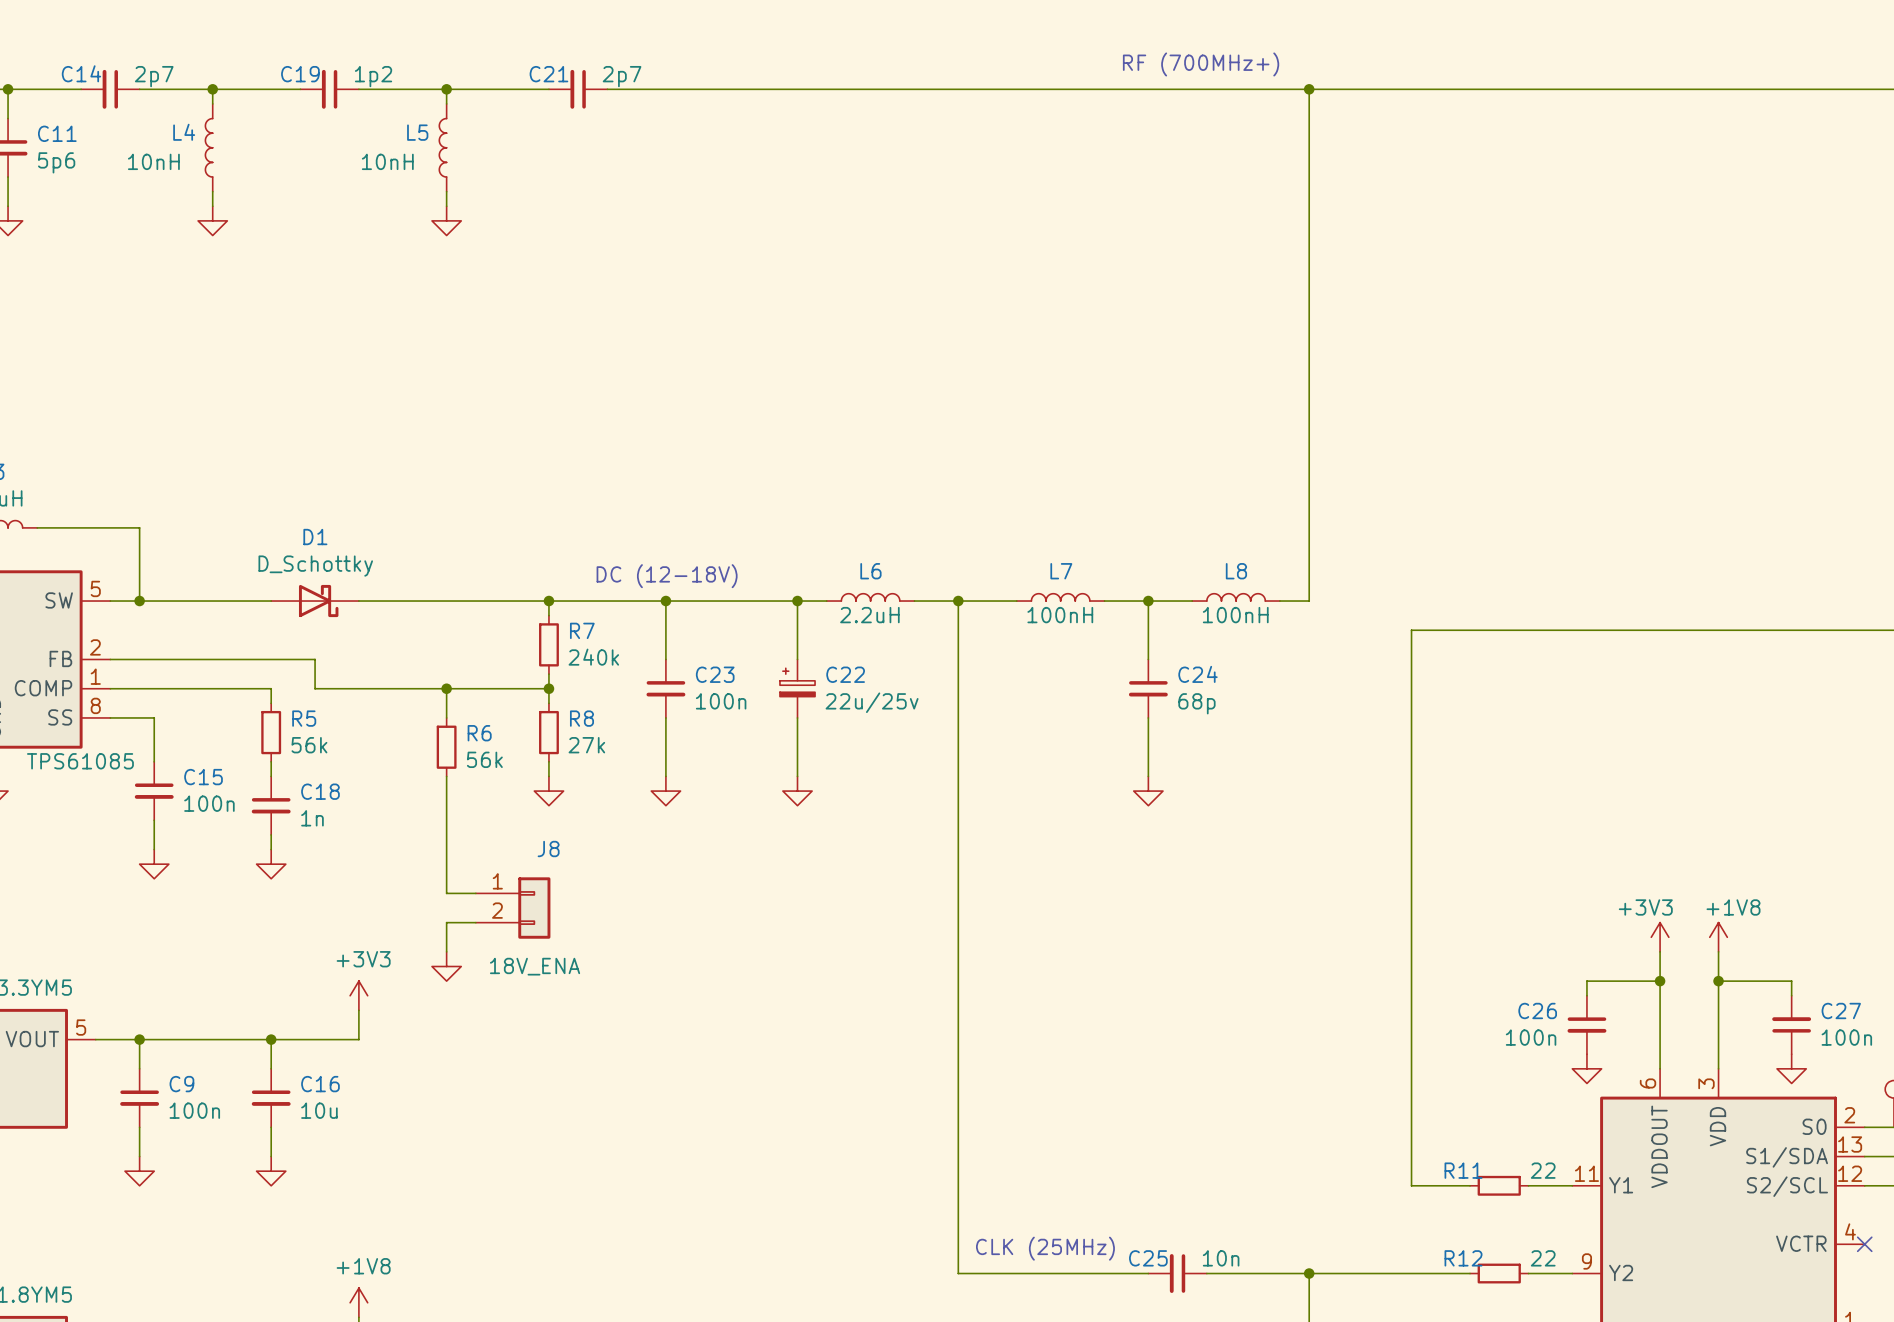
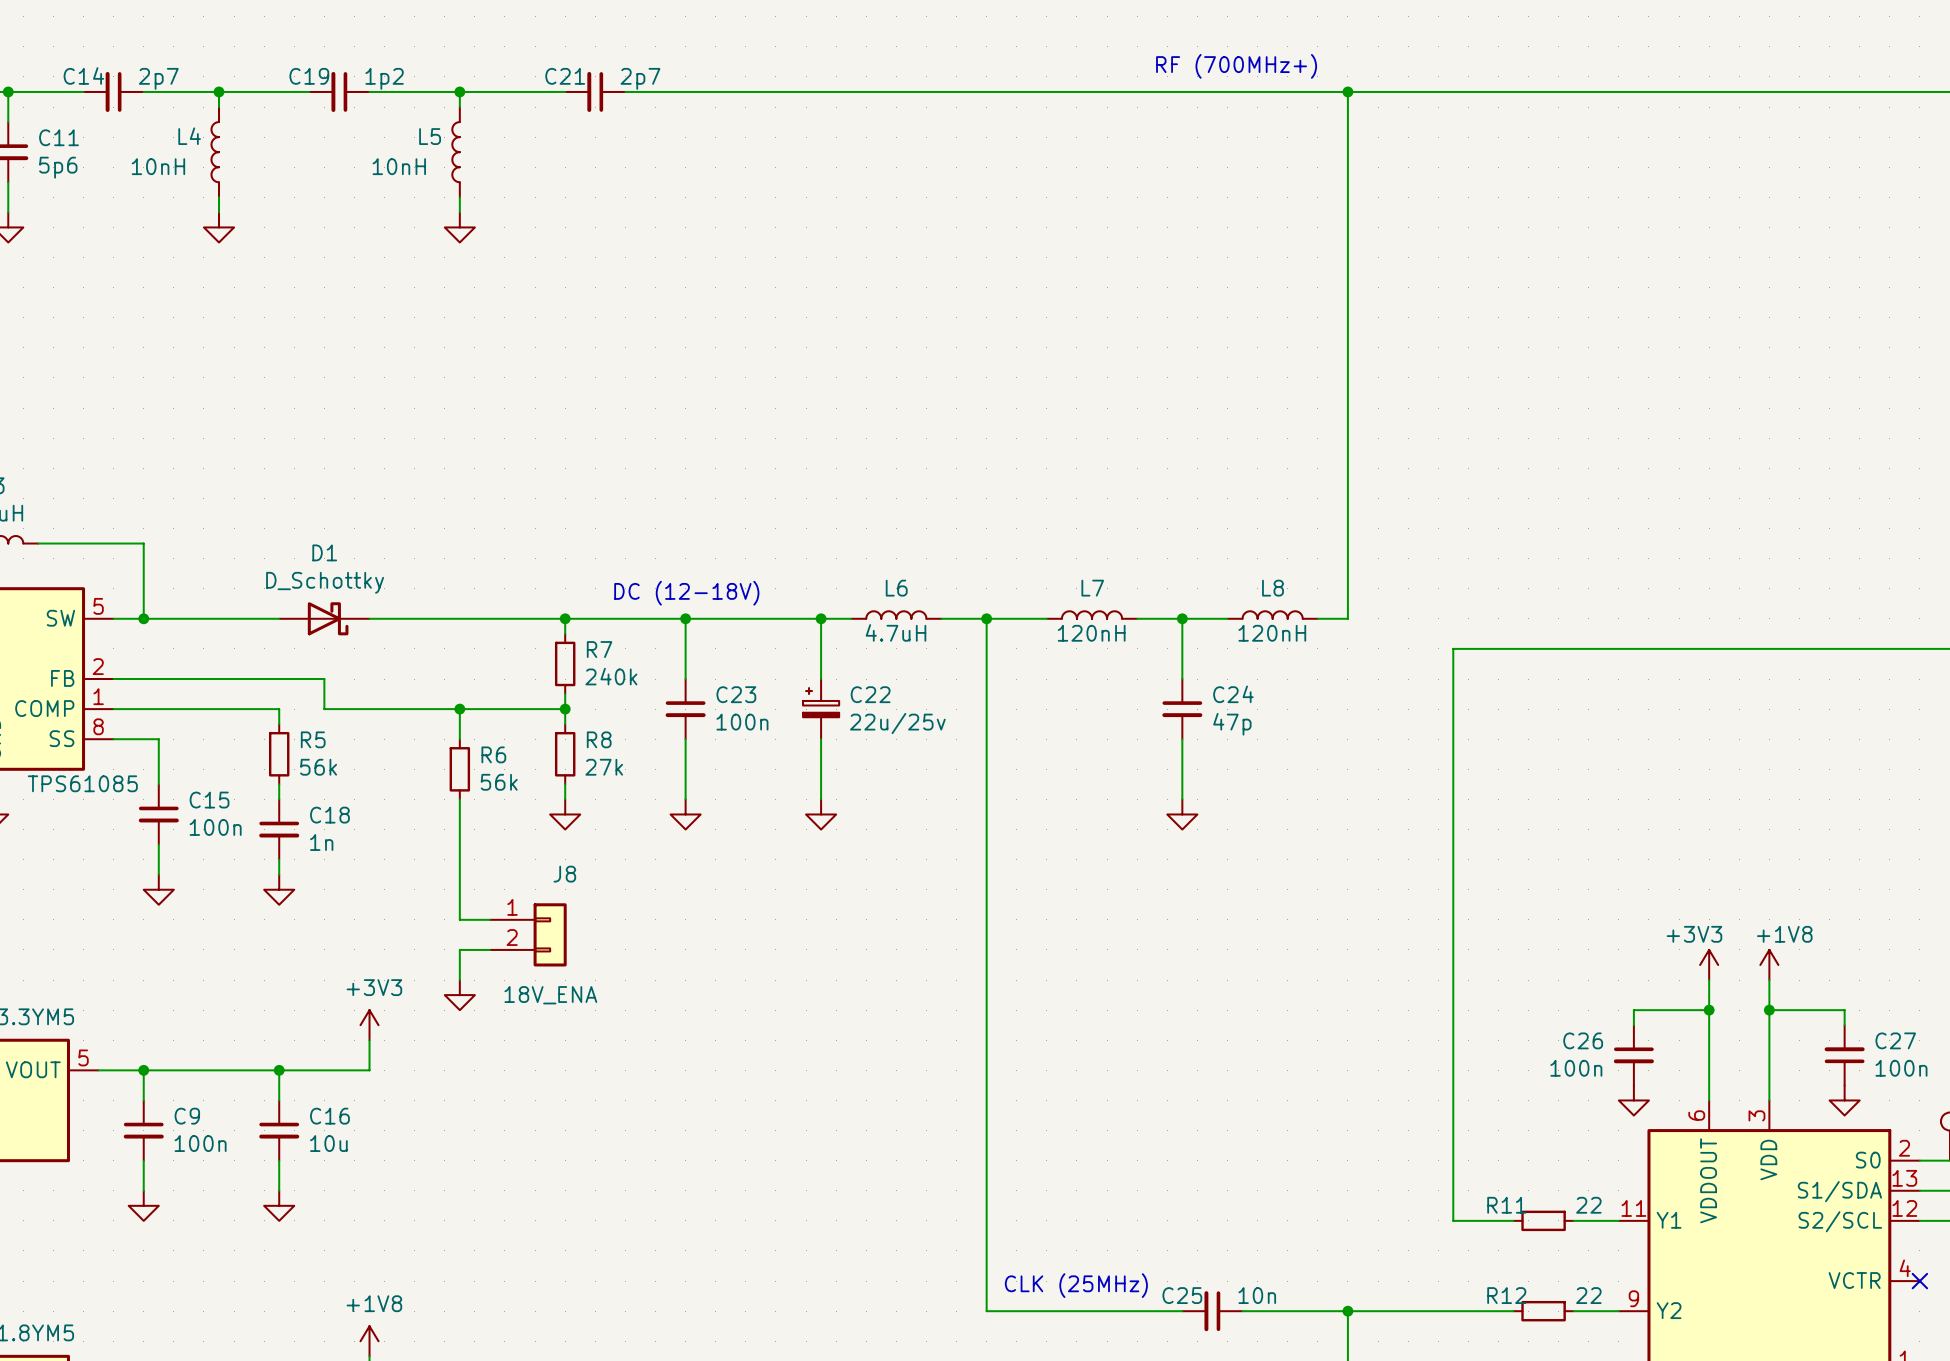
L6 value: 2.2uH (869, 615) -> 4.7uH (895, 632)
L7 value: 100nH (1060, 615) -> 120nH (1091, 633)
L8 value: 100nH (1235, 615) -> 120nH (1272, 633)
C24 value: 68p (1196, 703) -> 47p (1232, 724)

